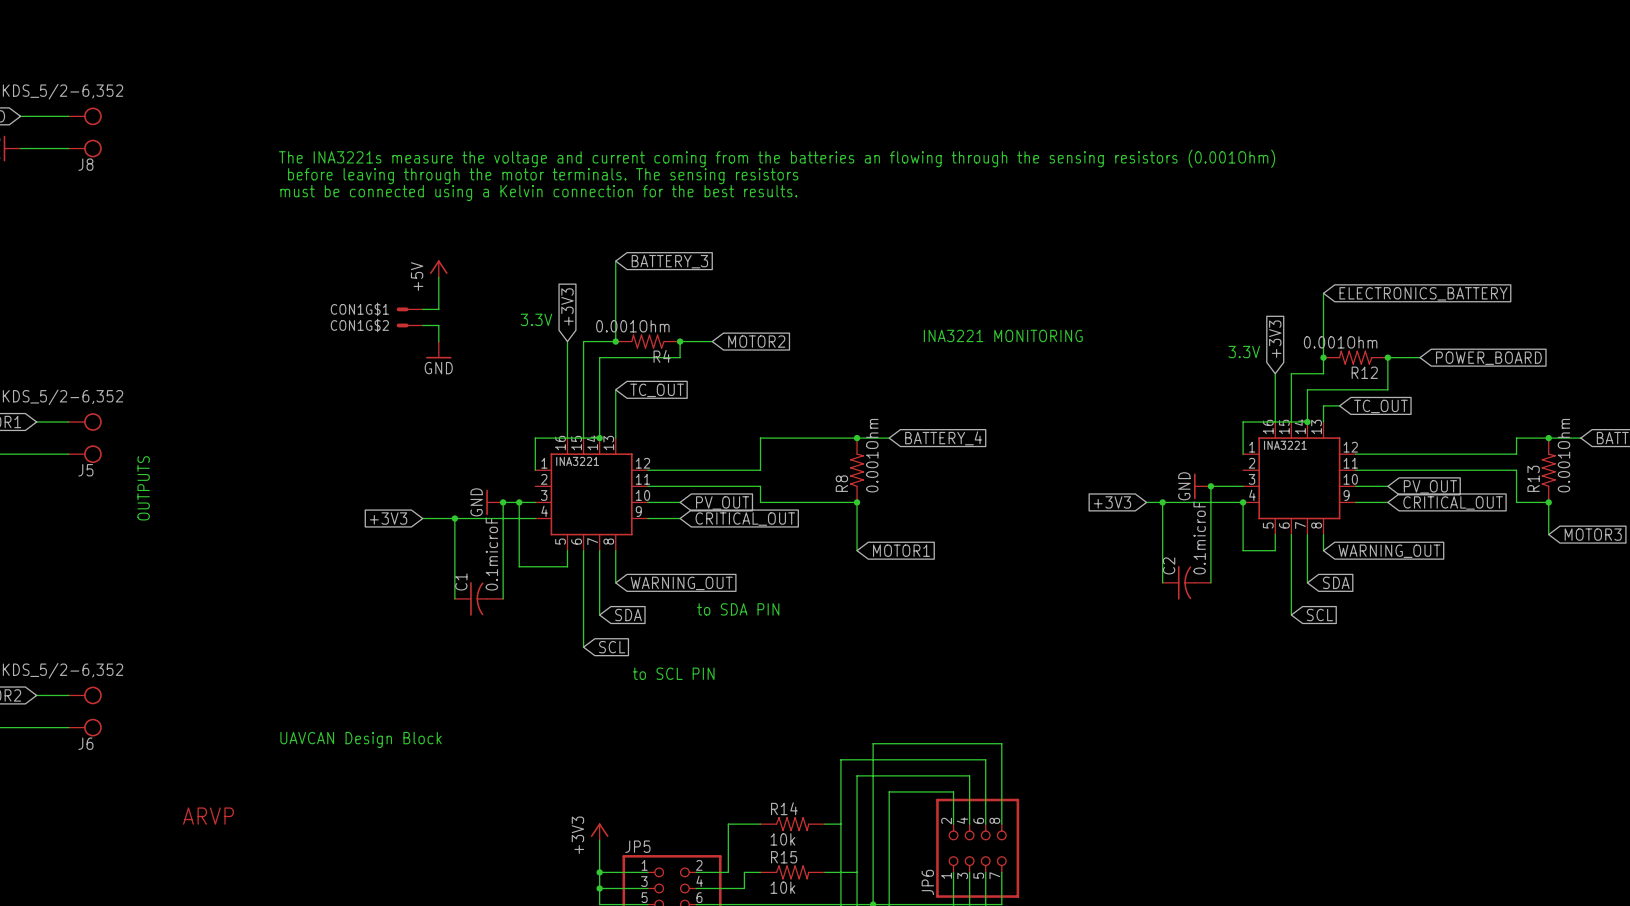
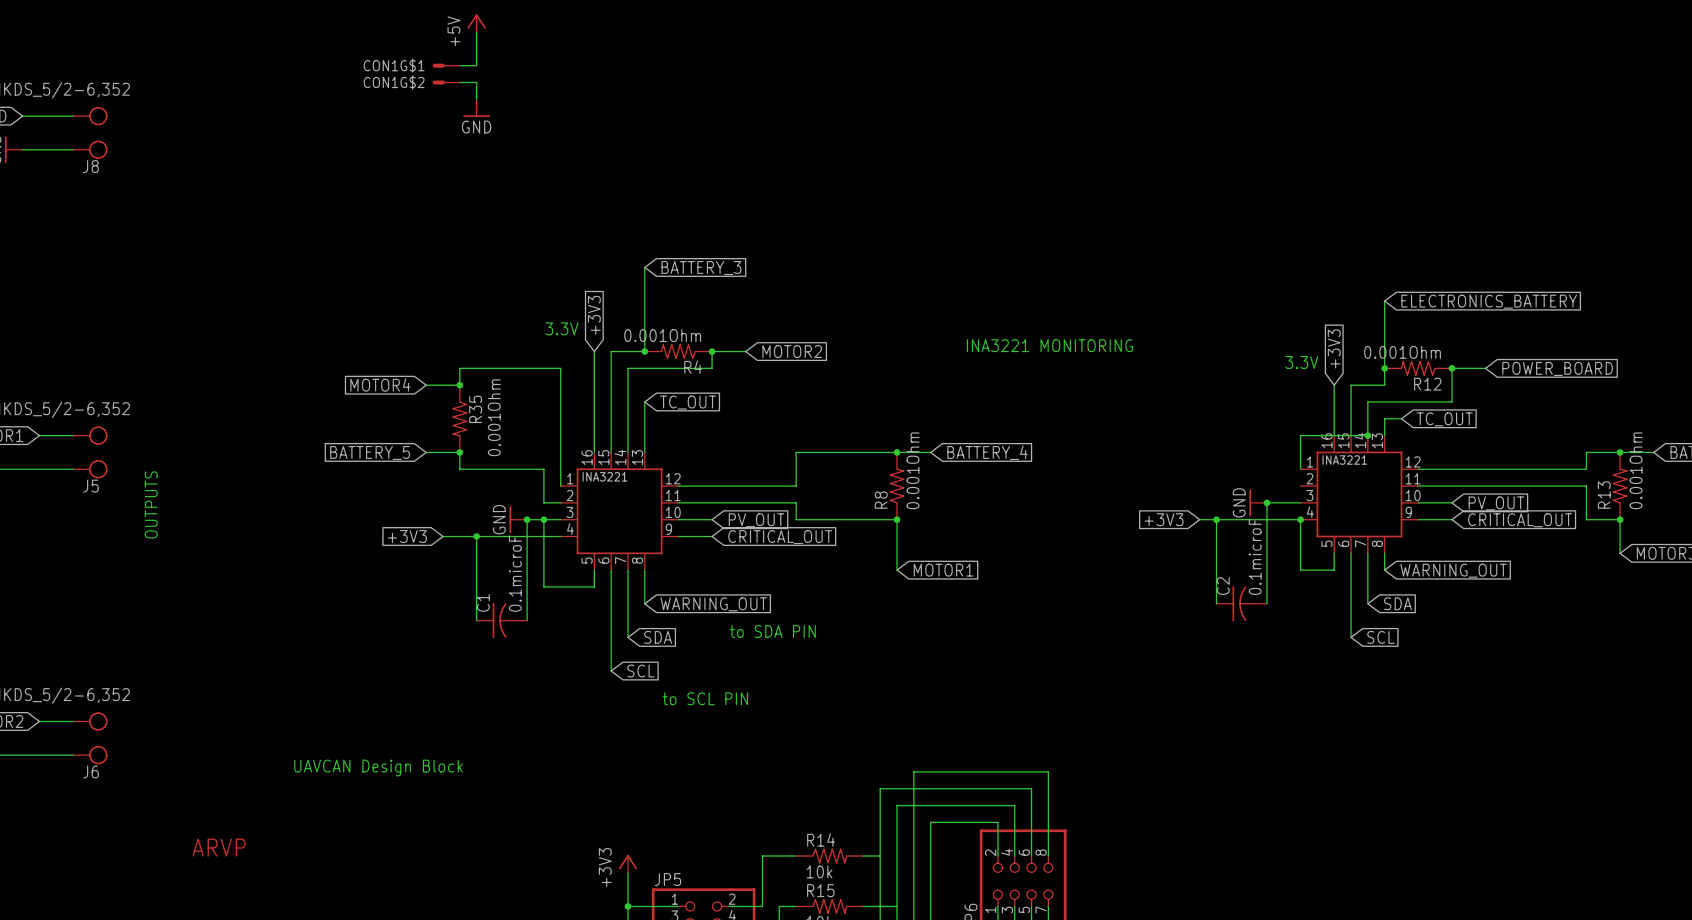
power symbol: none -> +5V (476, 23)
wire: none -> (476, 32) (476, 65) (459, 65)
wire: none -> (459, 82) (476, 82) (476, 99)
power symbol: none -> GND (476, 108)
text: The INA3221s measure the voltage and current coming from the batteries an flowing through the sensing resistors (0.001Ohm) (777, 158) -> none
text: before leaving through the motor terminals. The sensing resistors (543, 176) -> none
text: must be connected using a Kelvin connection for the best results. (538, 193) -> none
power symbol: +5V (438, 268) -> none
wire: (438, 277) (438, 309) (422, 309) -> none
CON1G$1 position: (409, 309) -> (446, 65)
CON1G$2 position: (409, 325) -> (446, 82)
wire: (422, 325) (438, 325) (438, 341) -> none
power symbol: GND (438, 350) -> none
global label: none -> MOTOR4 (380, 384)
junction: none -> (459, 385)
R35: none -> 0.001Ohm (459, 418)
global label: none -> BATTERY_5 (370, 453)
wire: none -> (426, 452) (459, 452) (459, 469) (543, 469) (543, 502) (560, 502)
junction: none -> (459, 452)
wire: (535, 438) (599, 438) -> (560, 452) (560, 368) (459, 368) (459, 385) (426, 385)
junction: (599, 438) -> none

